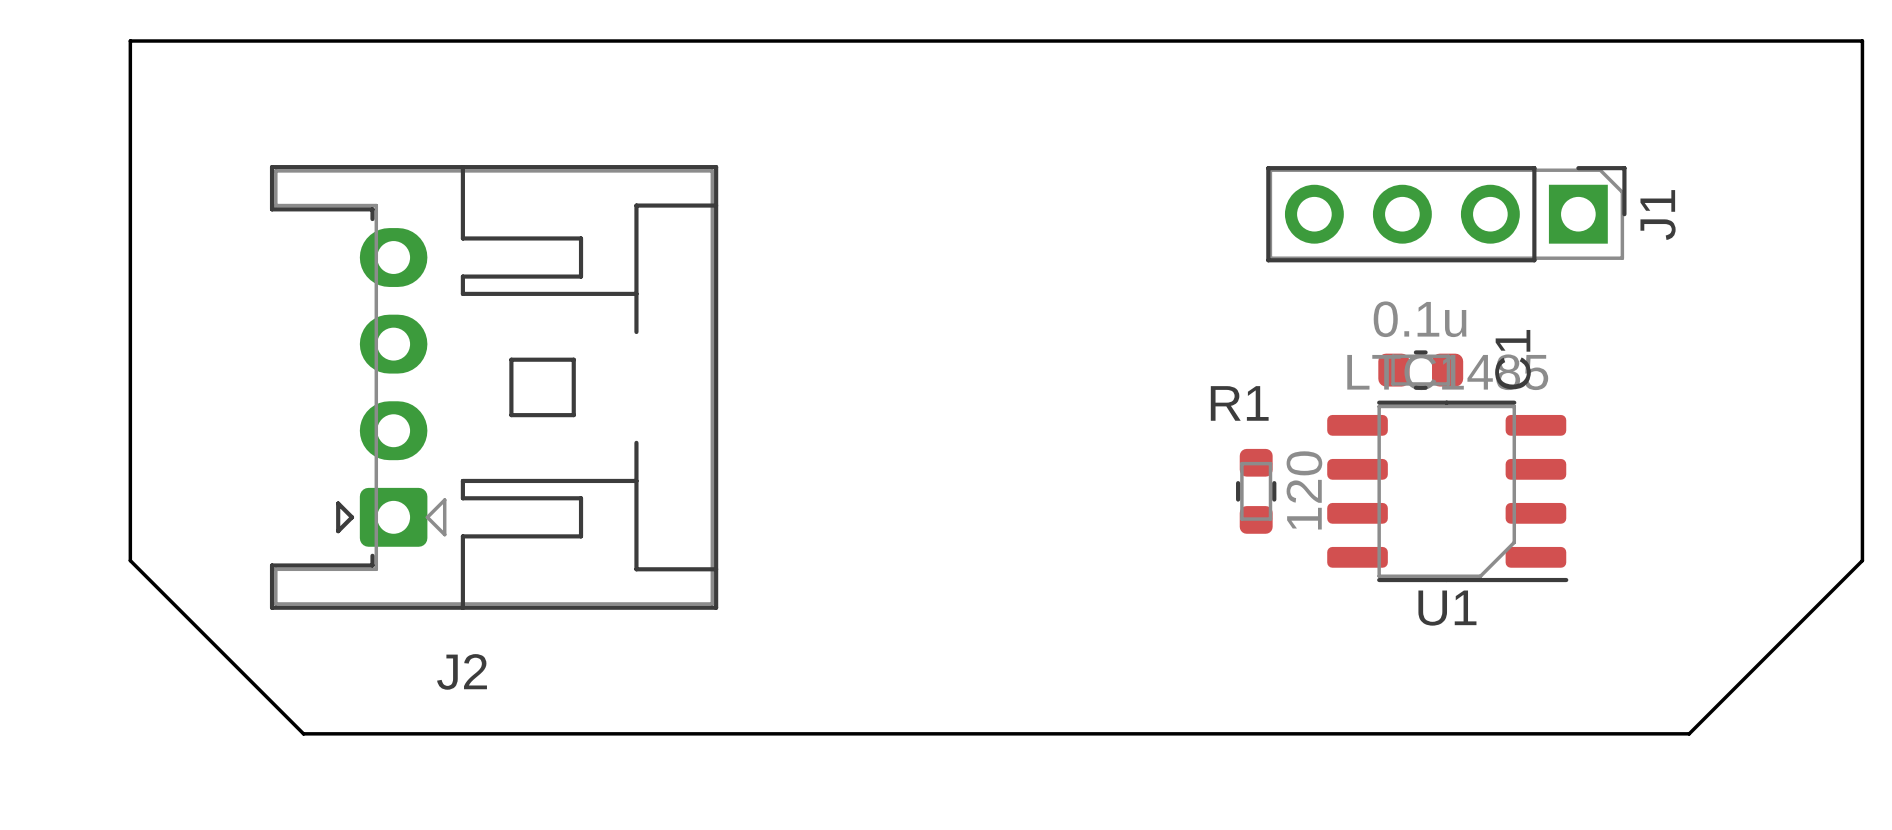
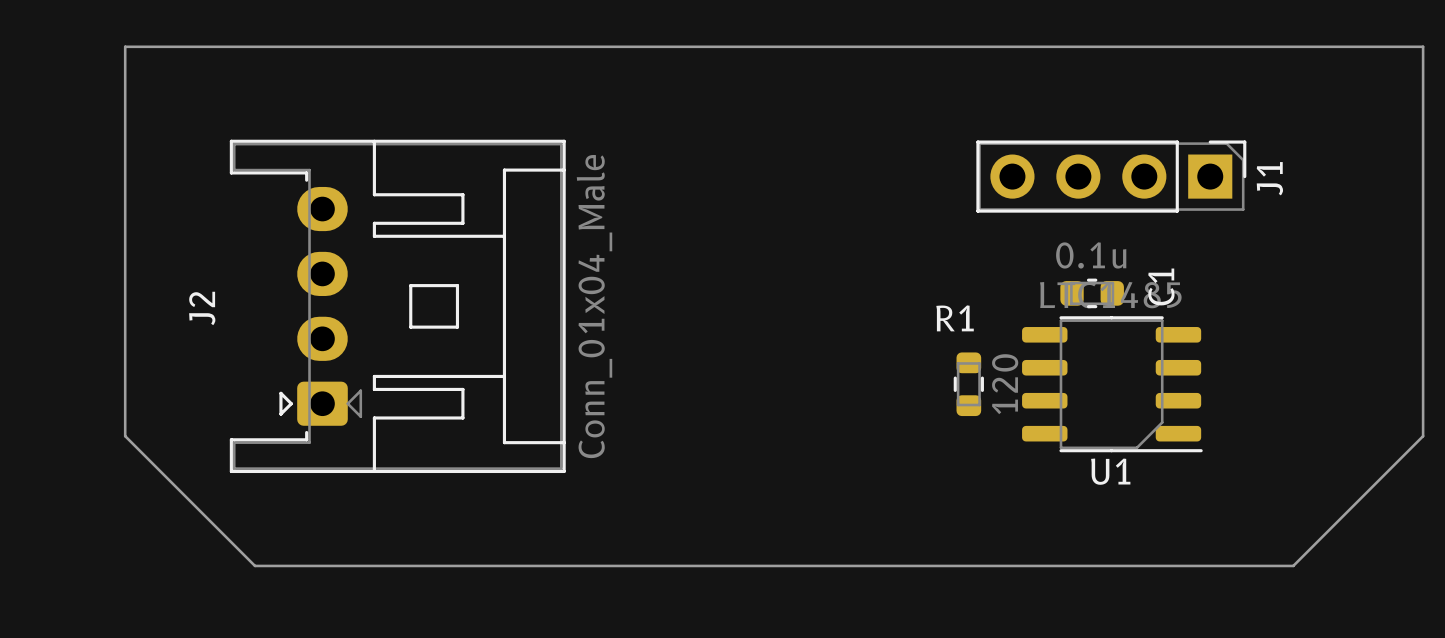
J2 footprint: [269, 165, 719, 610] -> [229, 139, 566, 474]
J2 value: none -> Conn_01x04_Male (594, 306)
J2 name position: J2 (462, 671) -> J2 (202, 308)

